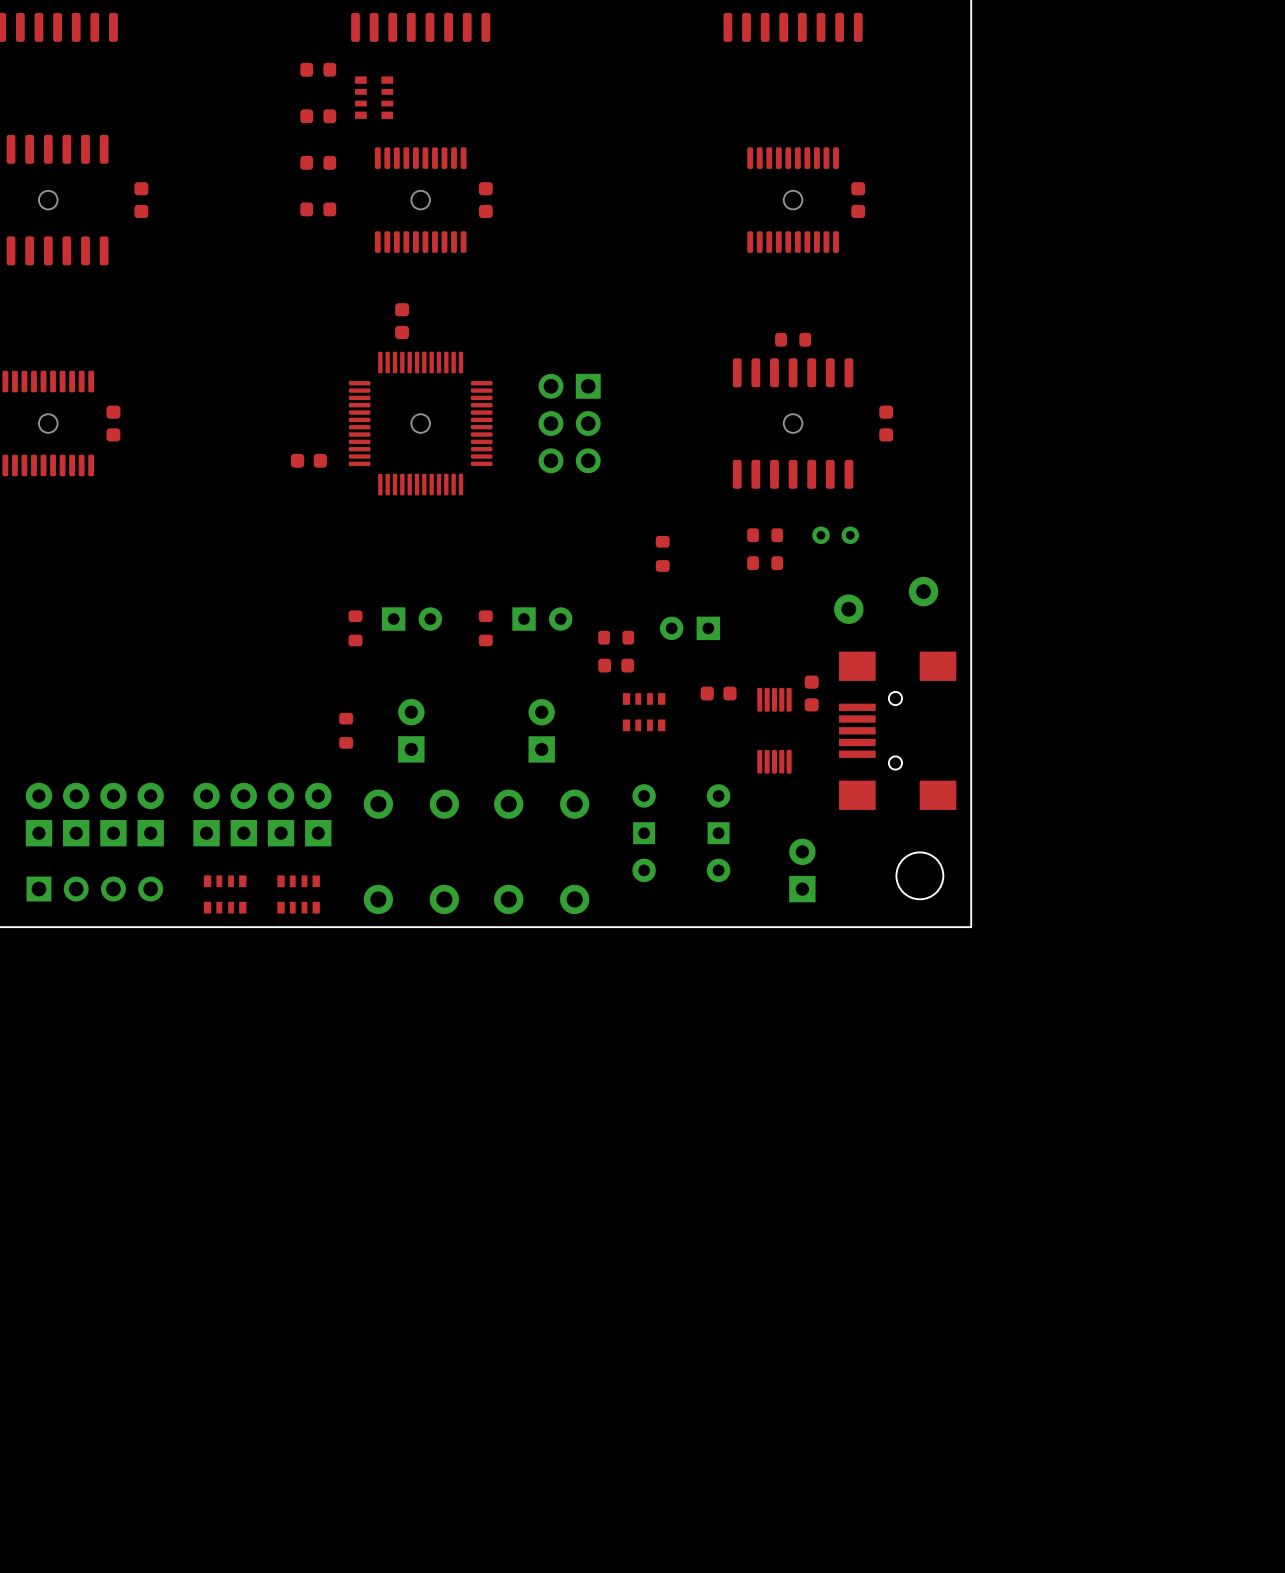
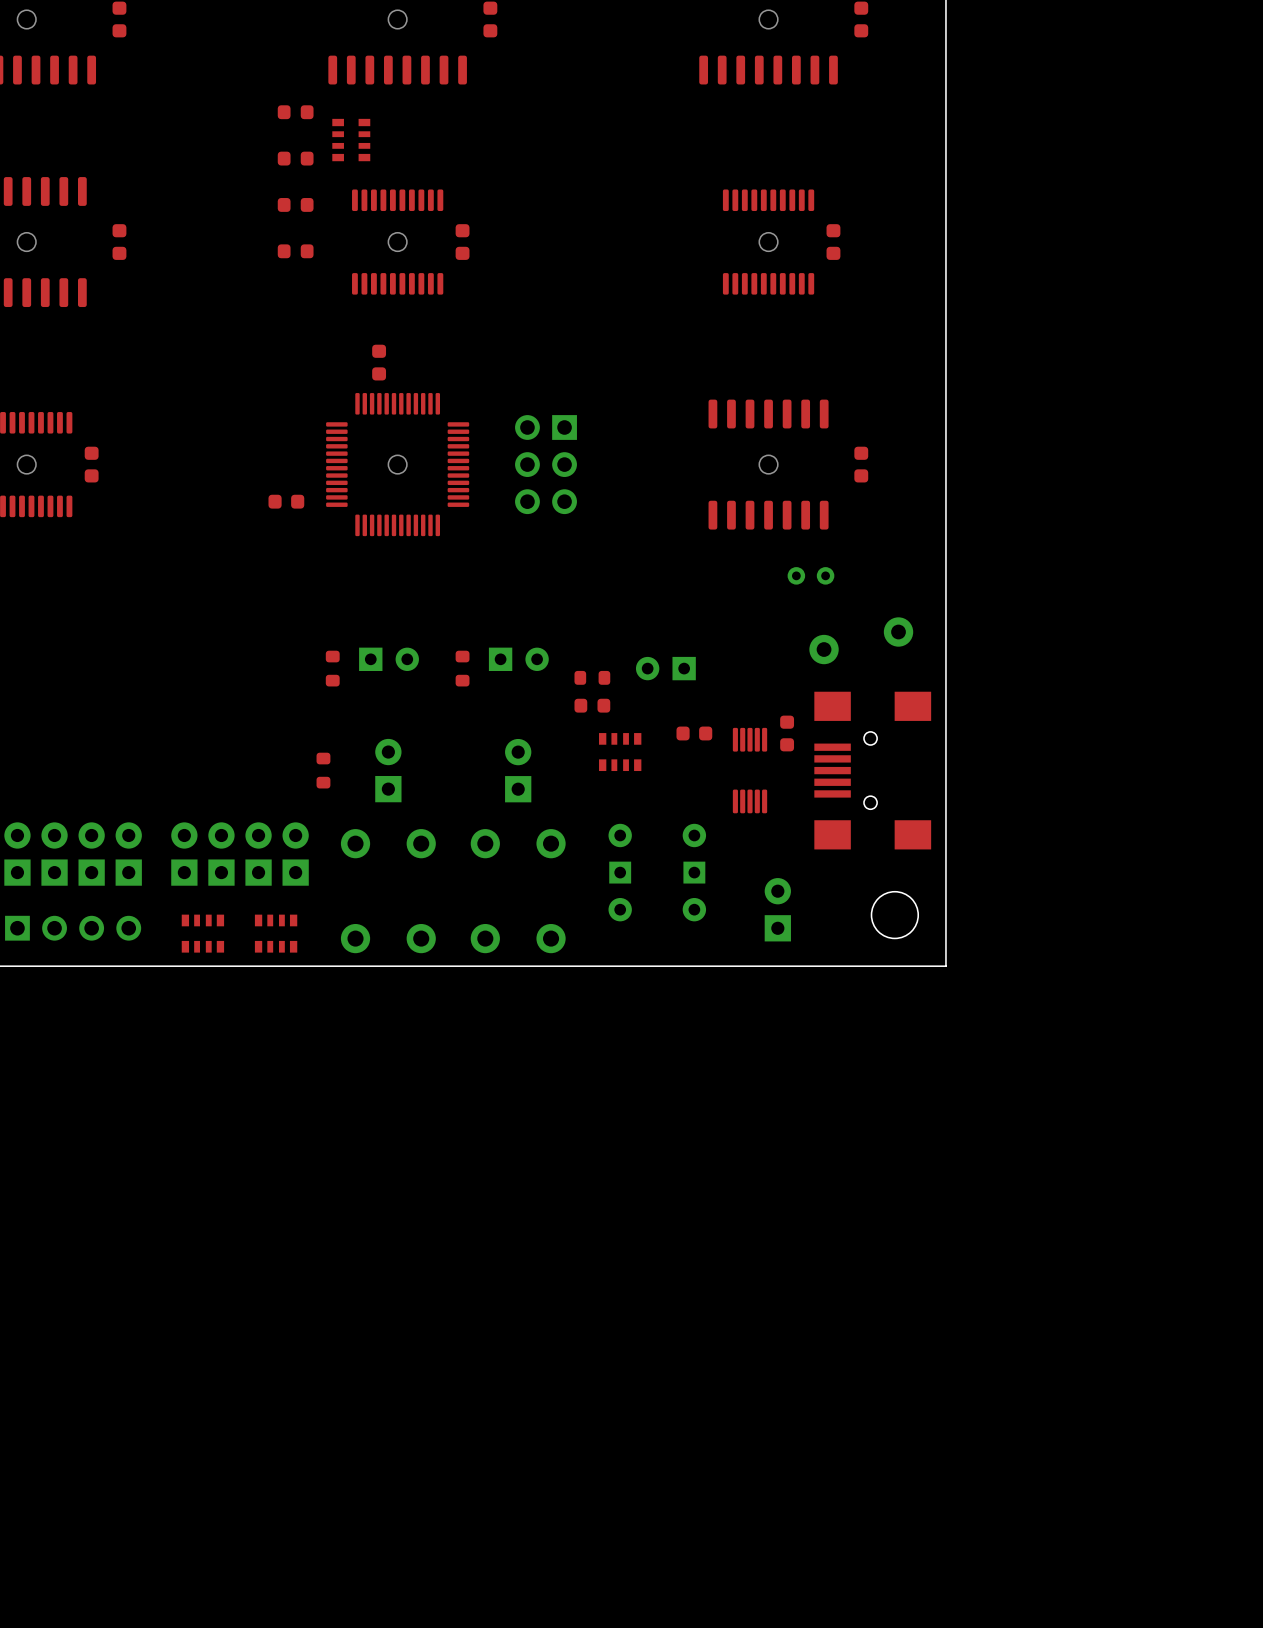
part: (793, 339) -> none
part: (765, 535) -> none
part: (662, 553) -> none
part: (765, 563) -> none

